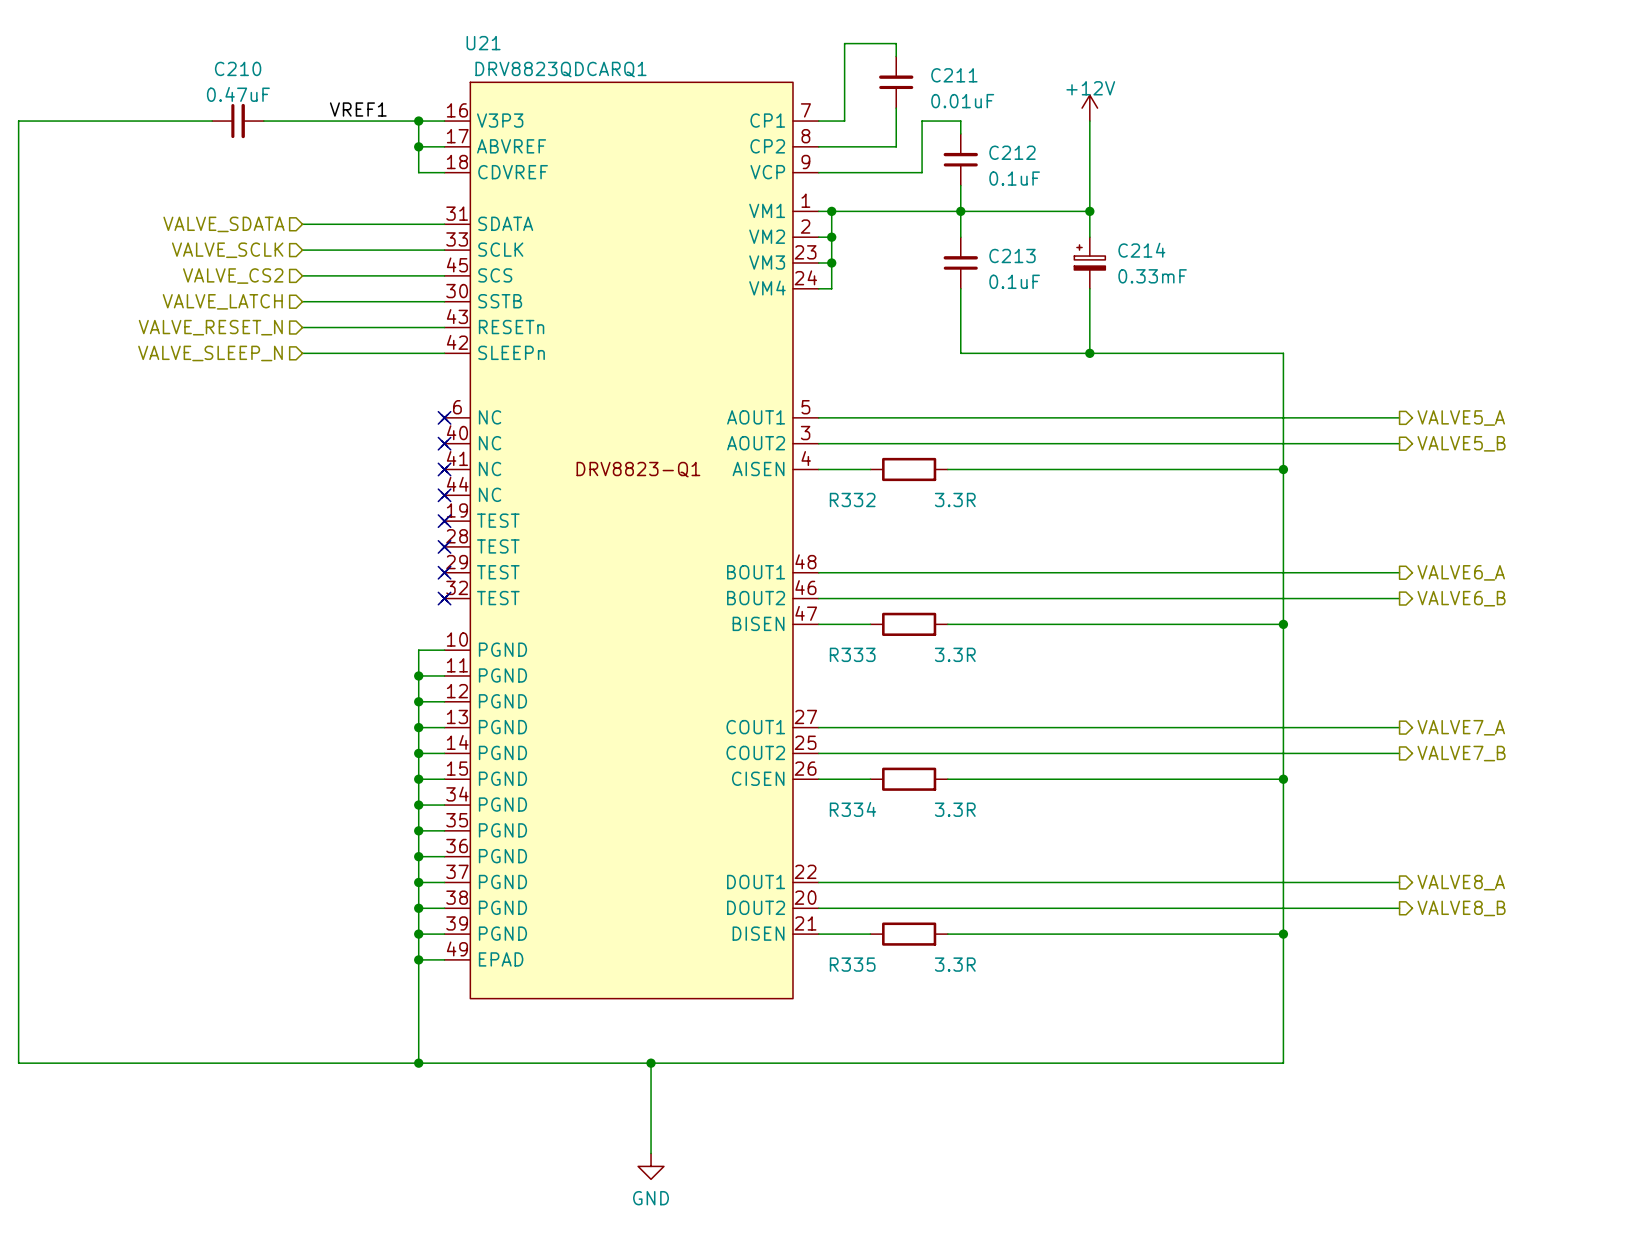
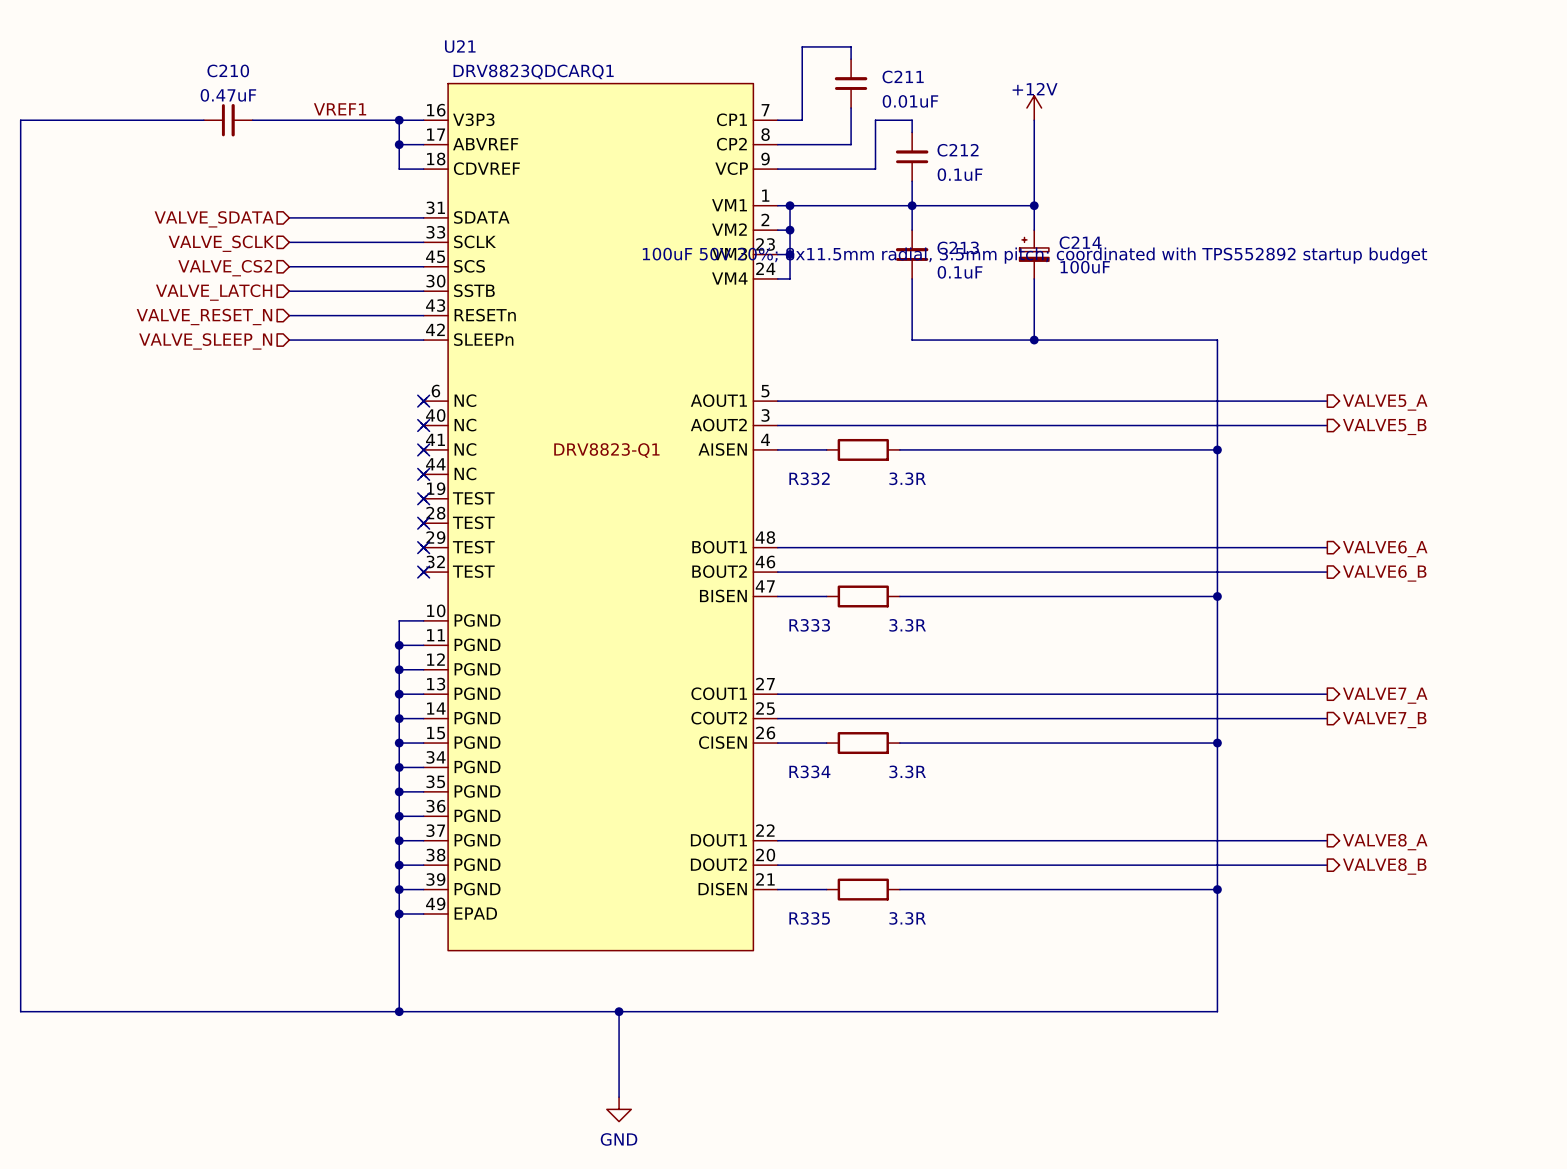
C214 text: none -> 100uF 50V 20%; 8x11.5mm radial, 3.5mm pitch; coordinated with TPS552892 startup budget (1034, 255)
C214 value: 0.33mF (1152, 276) -> 100uF (1085, 267)

